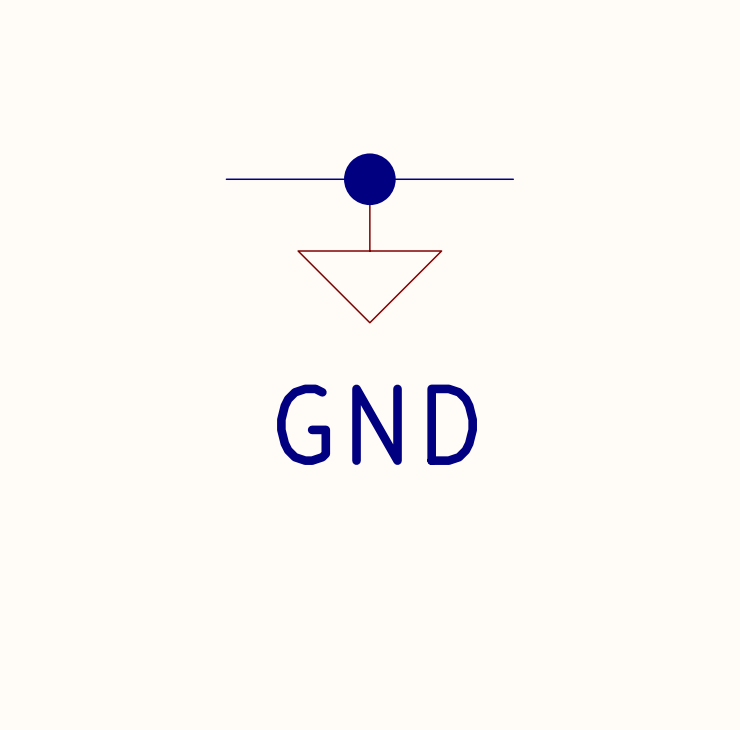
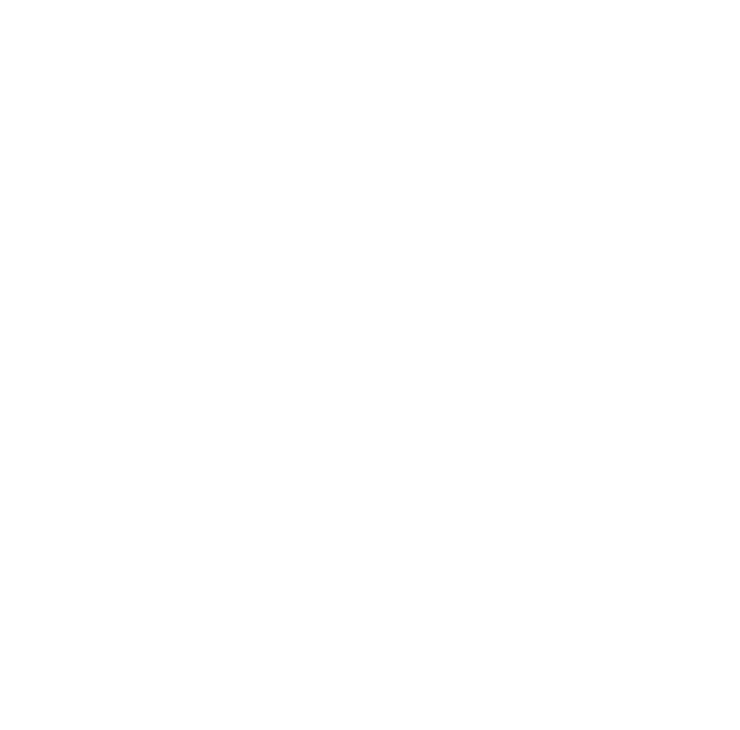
wire: (226, 179) (513, 179) -> none
junction: (369, 179) -> none
power symbol: GND (369, 251) -> none

